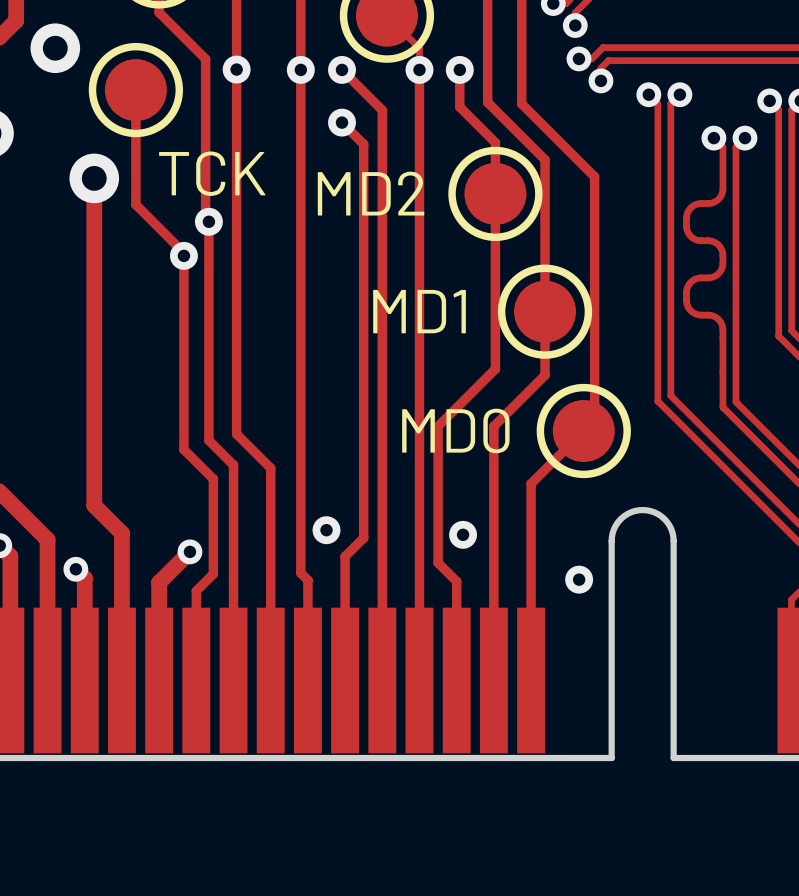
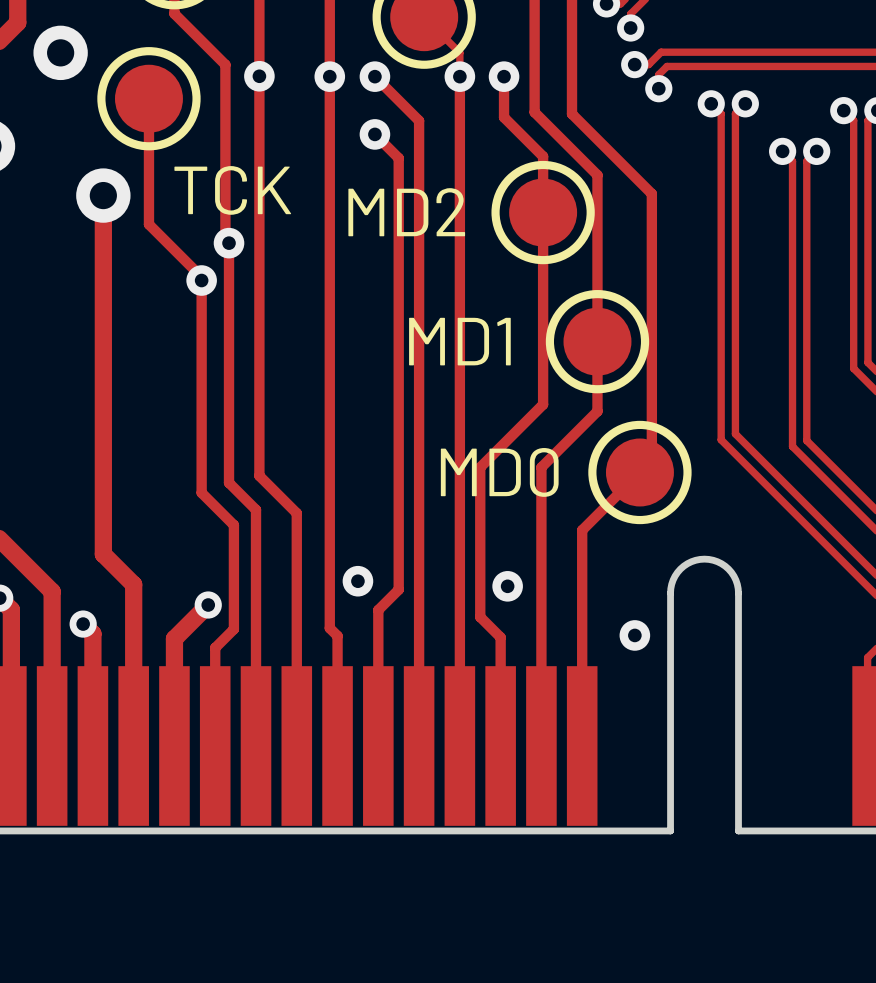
track: (722, 188) (721, 195) (715, 201) (692, 206) (686, 218) (686, 229) (690, 236) (698, 240) (715, 243) (721, 249) (722, 255) -> (792, 206) (792, 280)
track: (722, 263) (717, 274) (693, 280) (687, 286) (686, 292) (686, 303) (690, 310) (698, 314) (715, 317) (721, 323) (722, 329) -> (792, 288) (792, 361)

